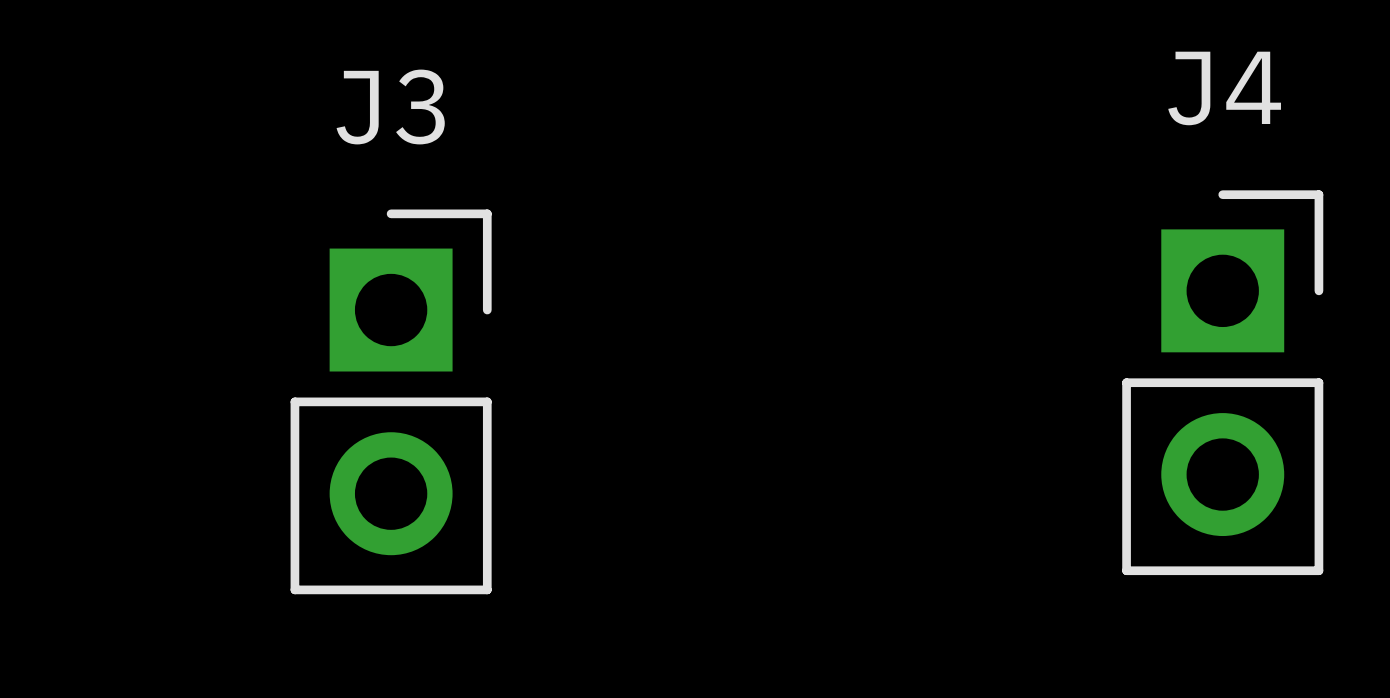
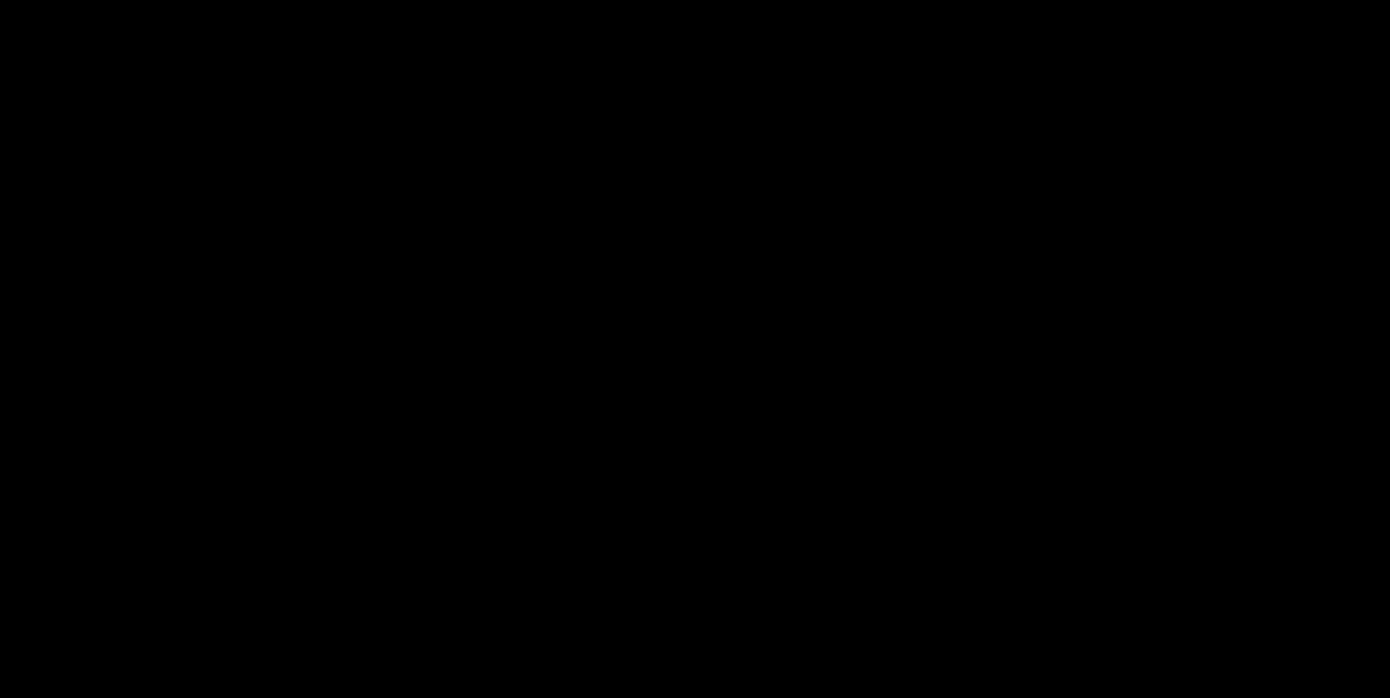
J4: (1222, 382) -> none
J3: (391, 401) -> none

